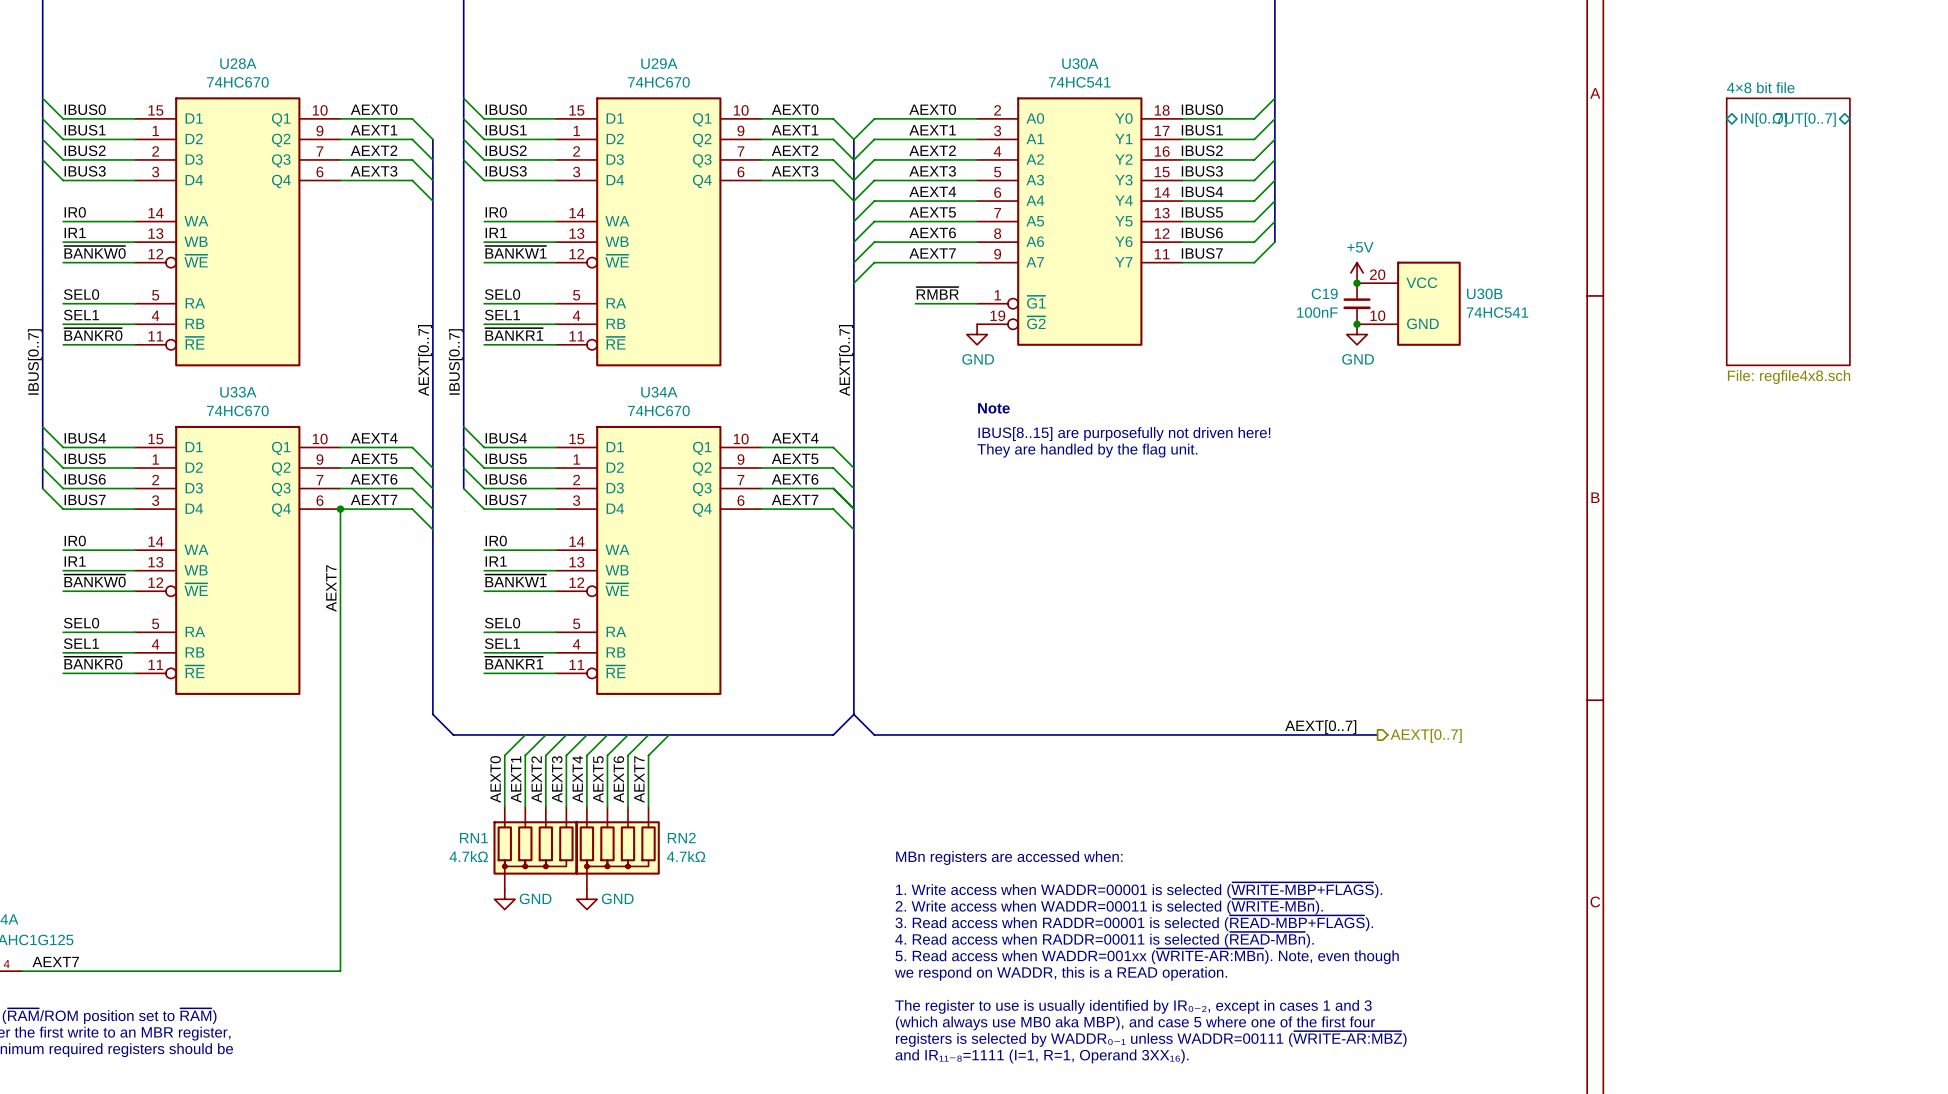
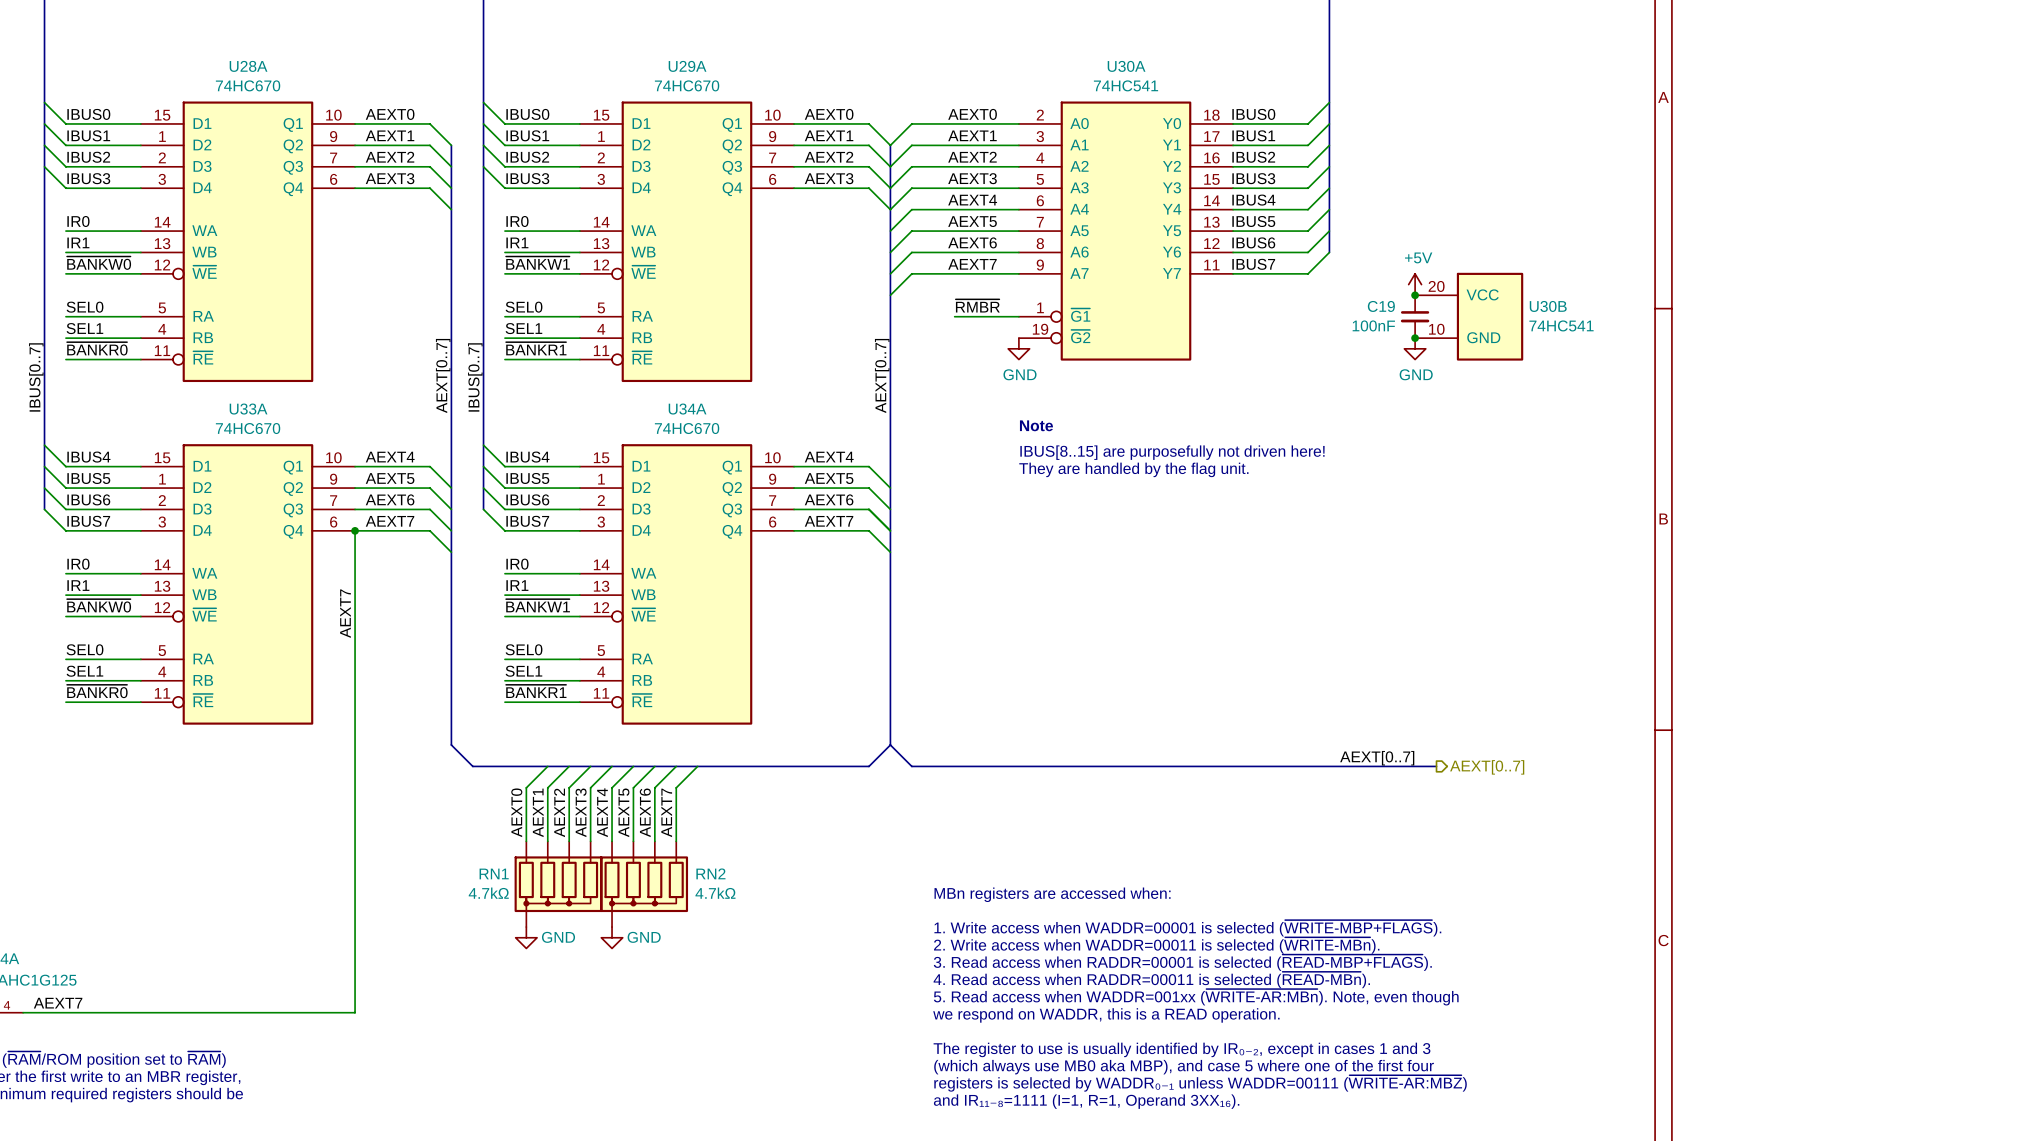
sheet pin: IN[0..7] (1763, 119) -> none
sheet pin: OUT[0..7] (1804, 119) -> none
sheet 4×8 bit file: File: regfile4x8.sch (1788, 231) -> none

